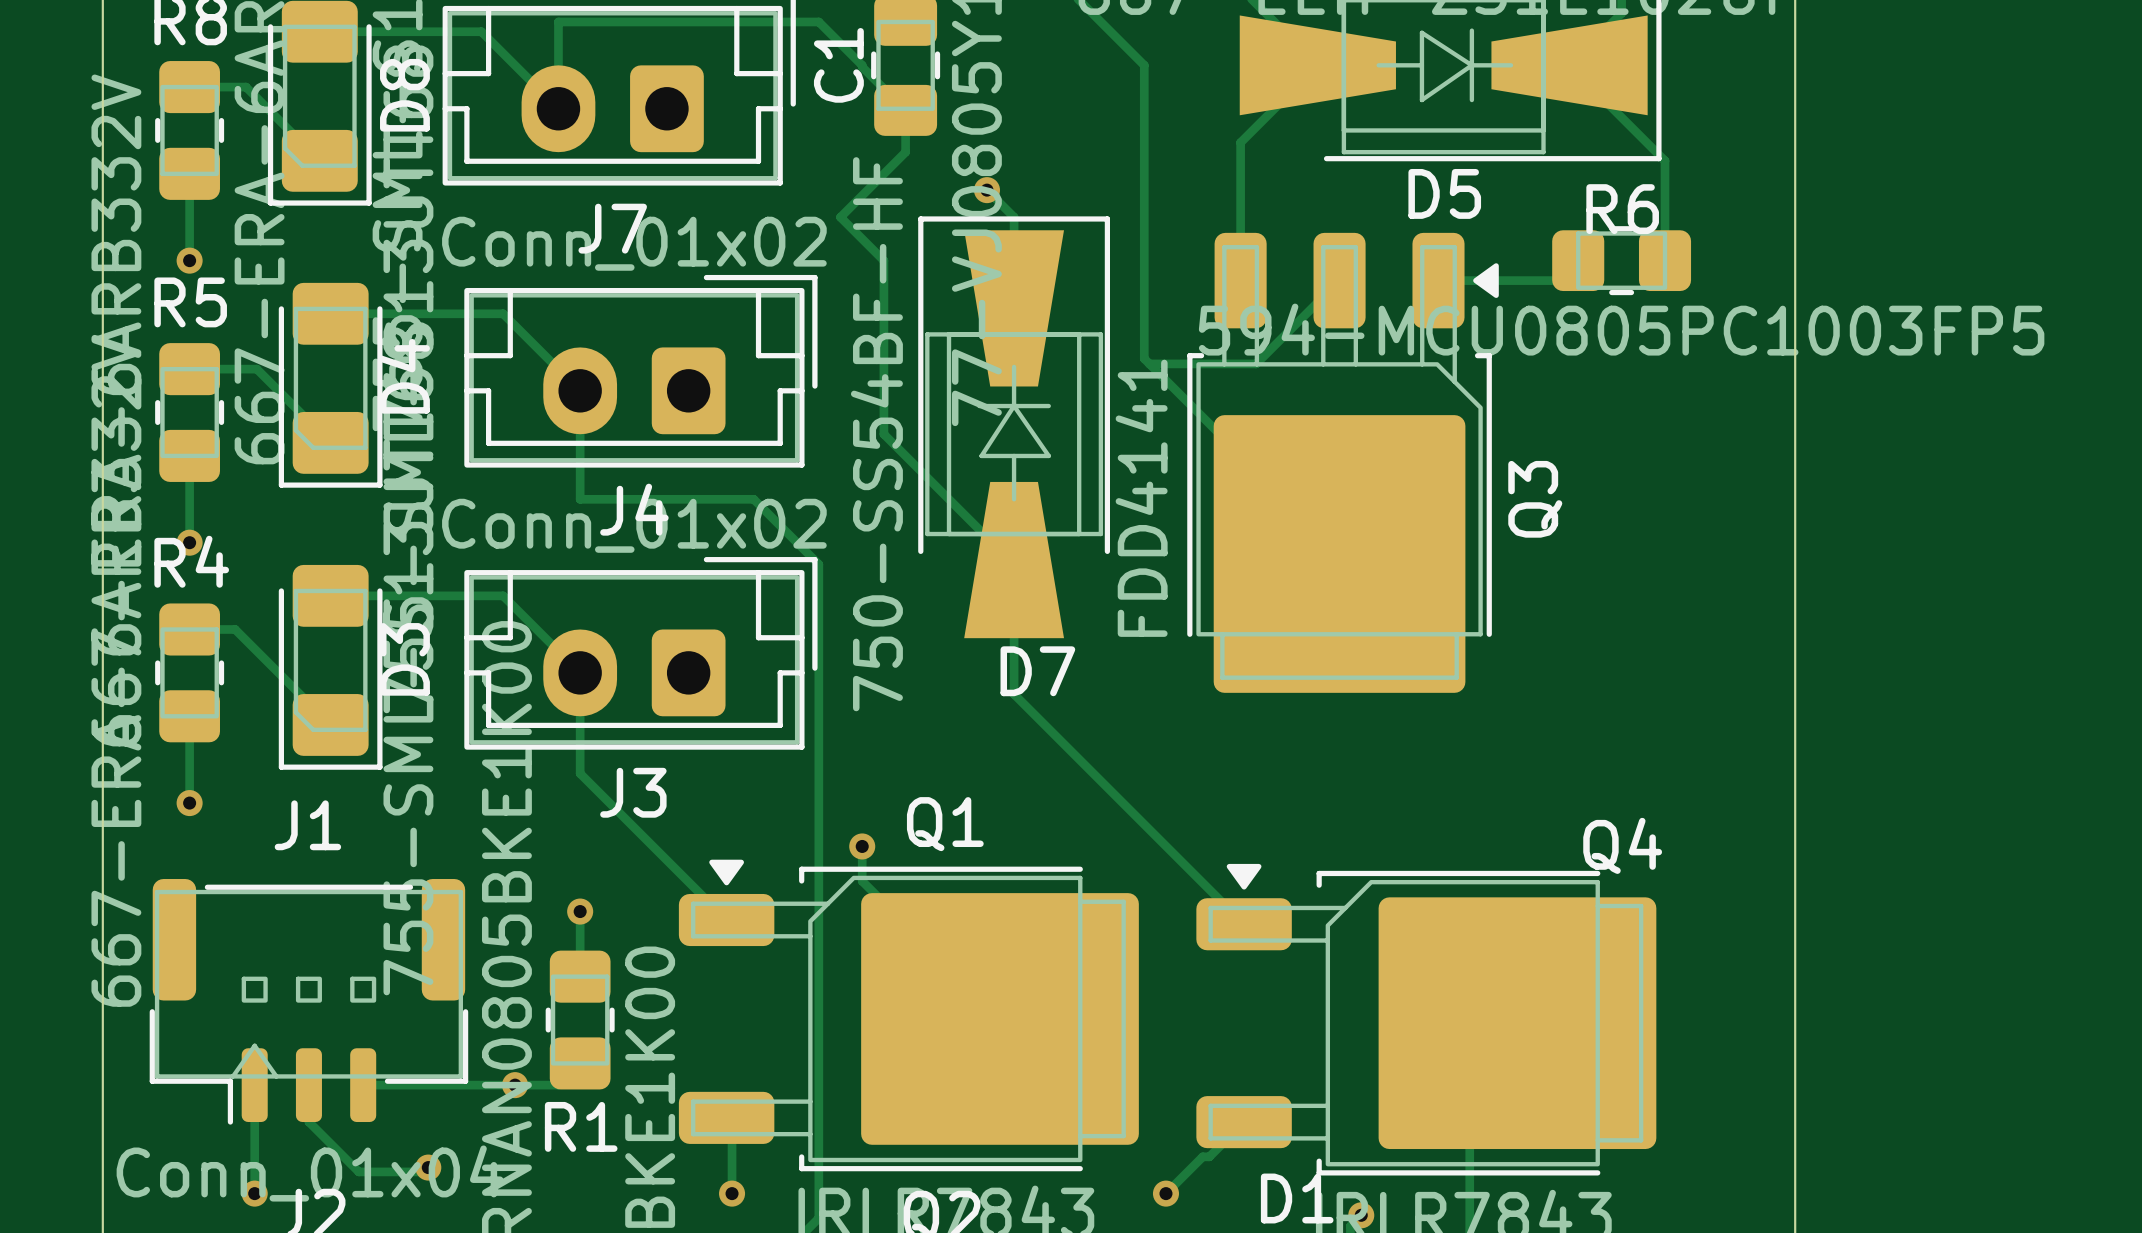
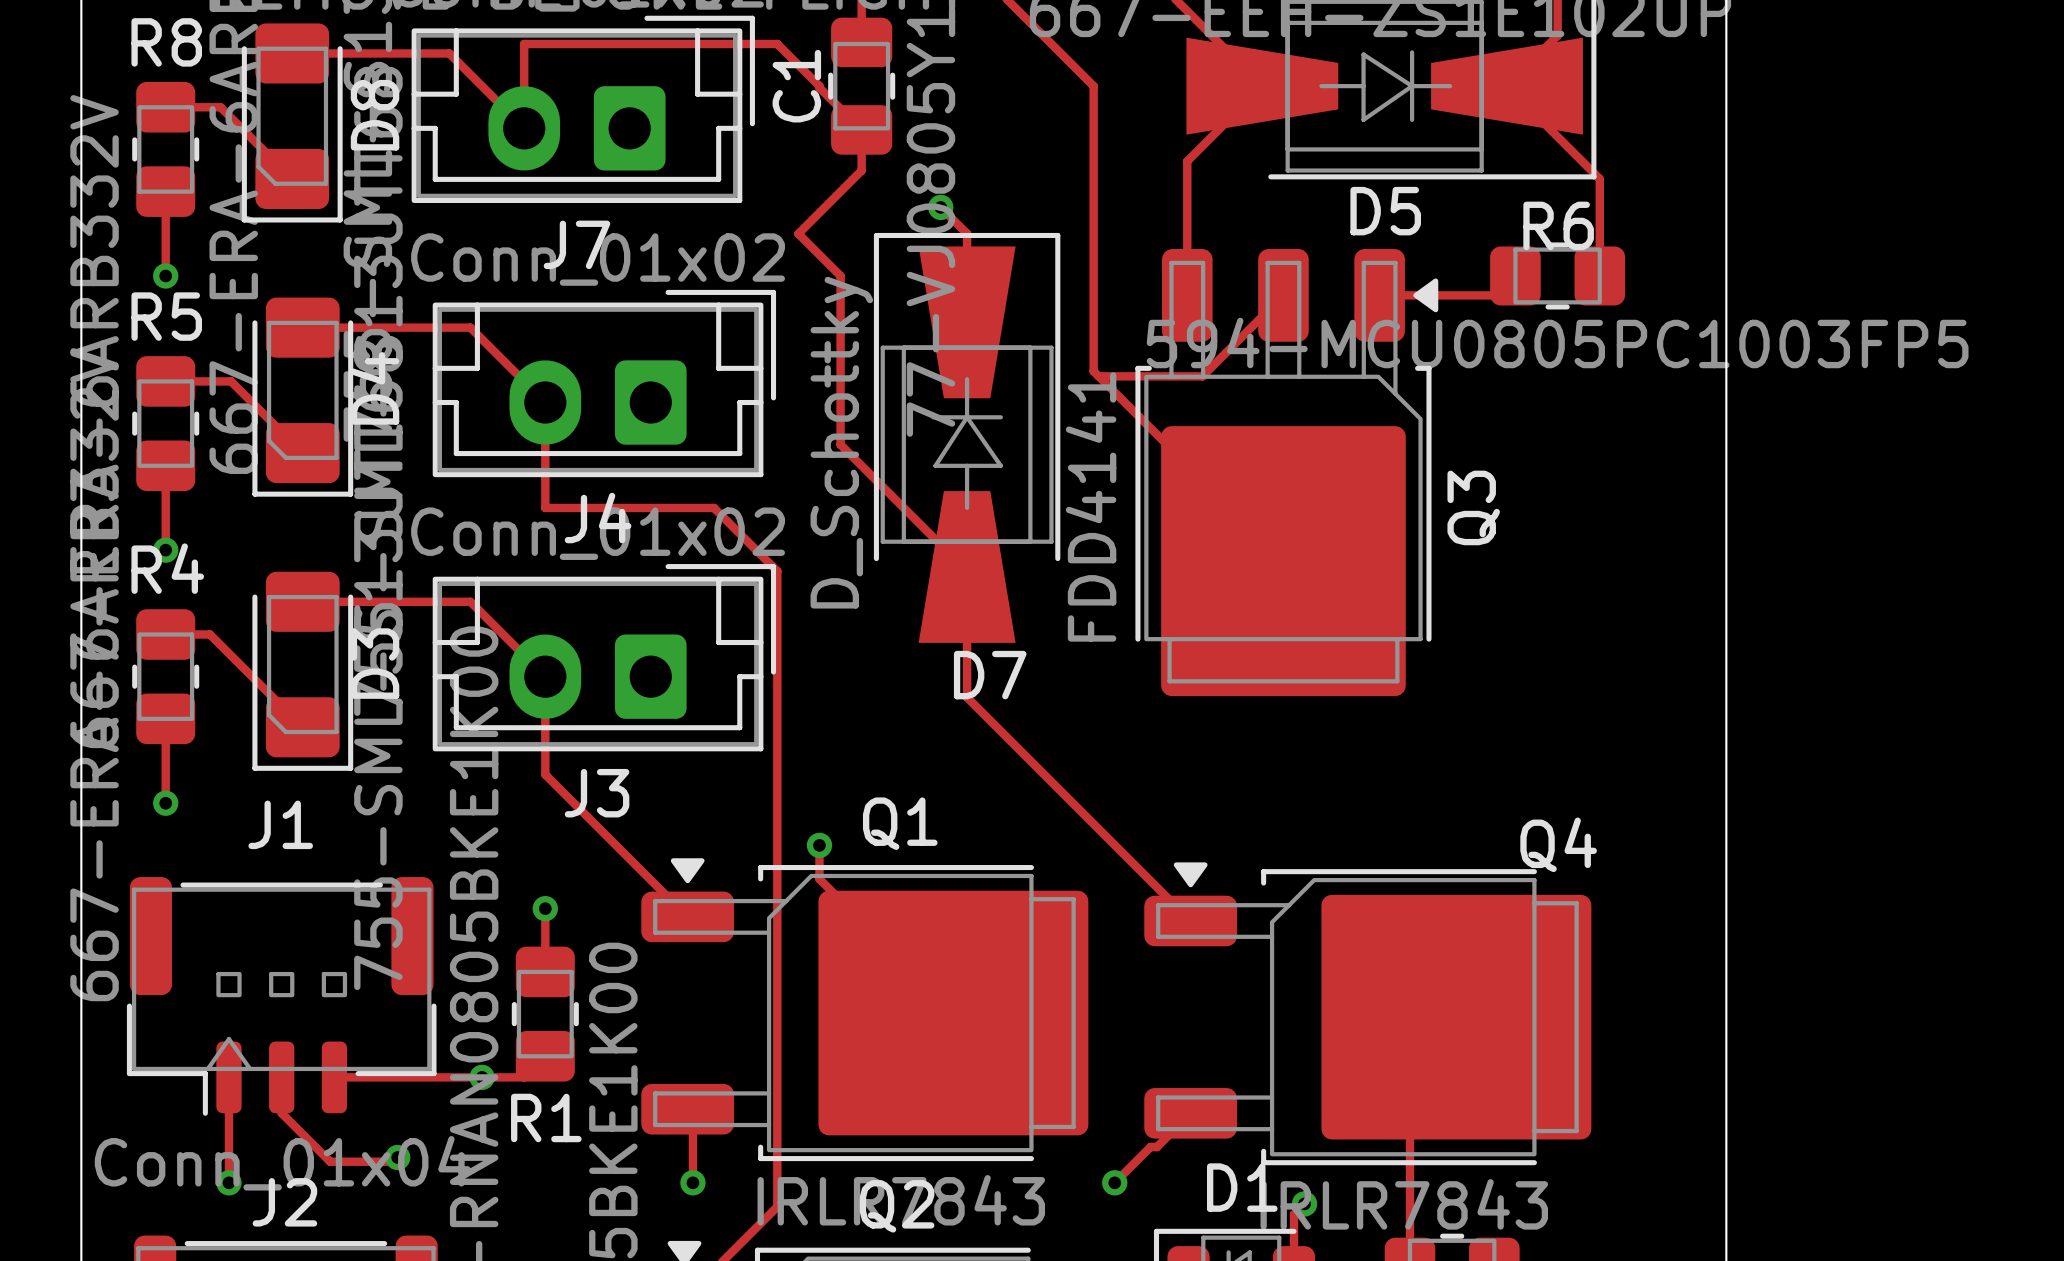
D7 value: 750-SS54BF-HF (876, 434) -> D_Schottky (841, 442)

